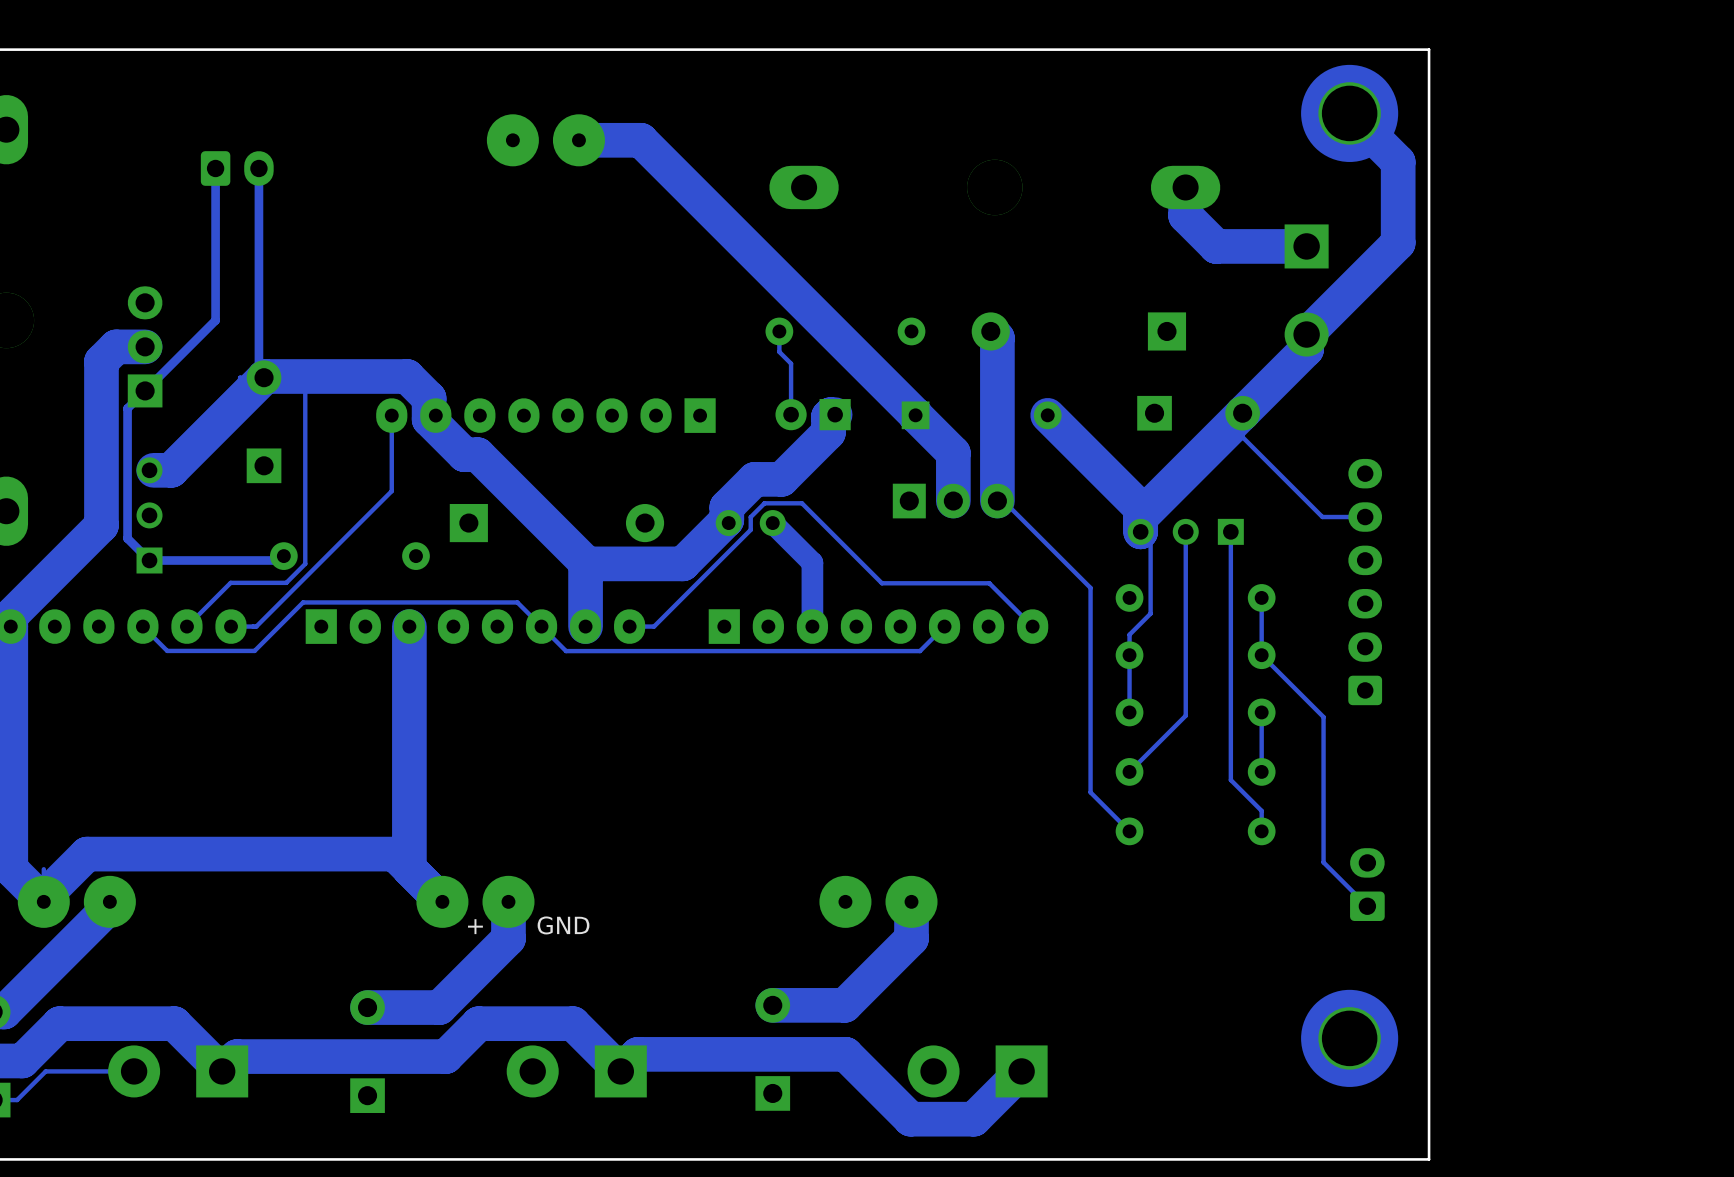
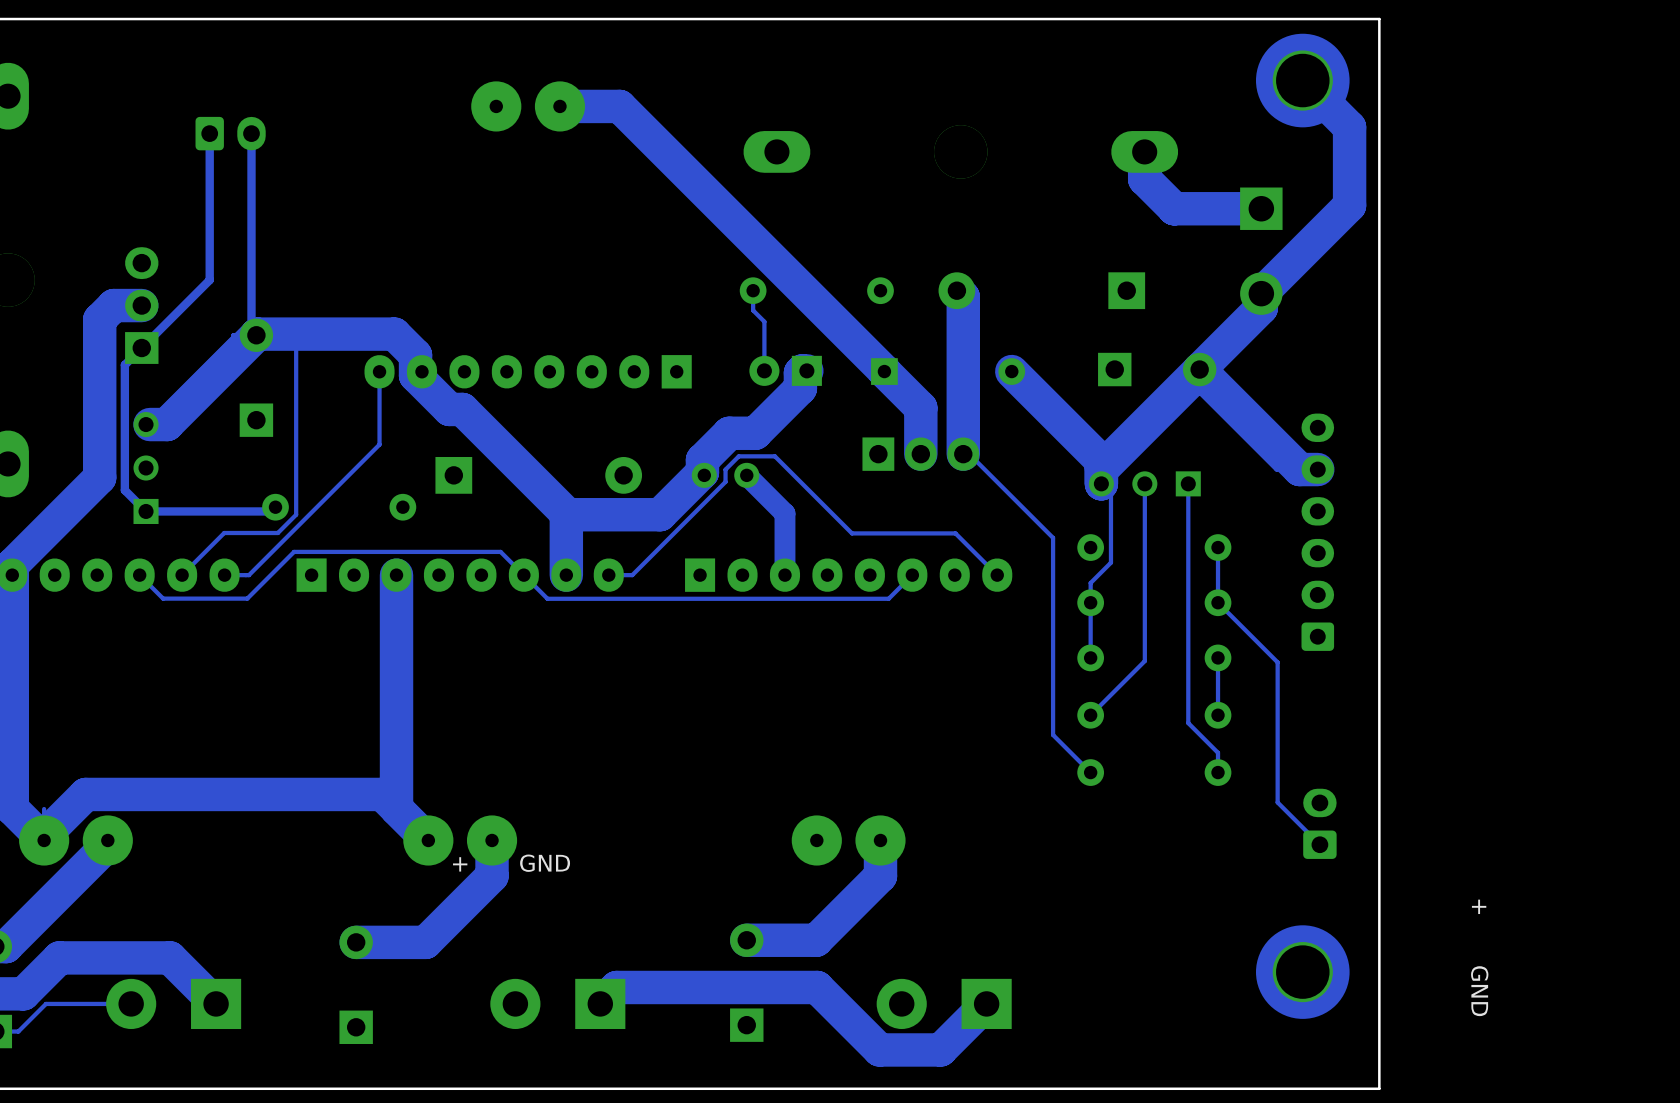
track: none -> (1199, 369) (1299, 469) (1317, 469)
text: none -> + (1479, 906)
text: none -> GND (1479, 991)
track: (620, 1071) (573, 1023) (478, 1023) (445, 1056) (237, 1056) (222, 1071) -> none

